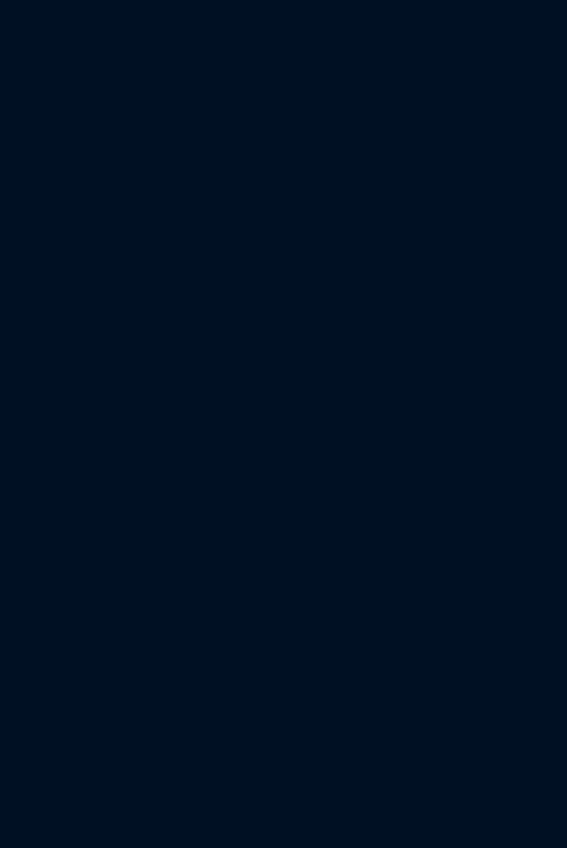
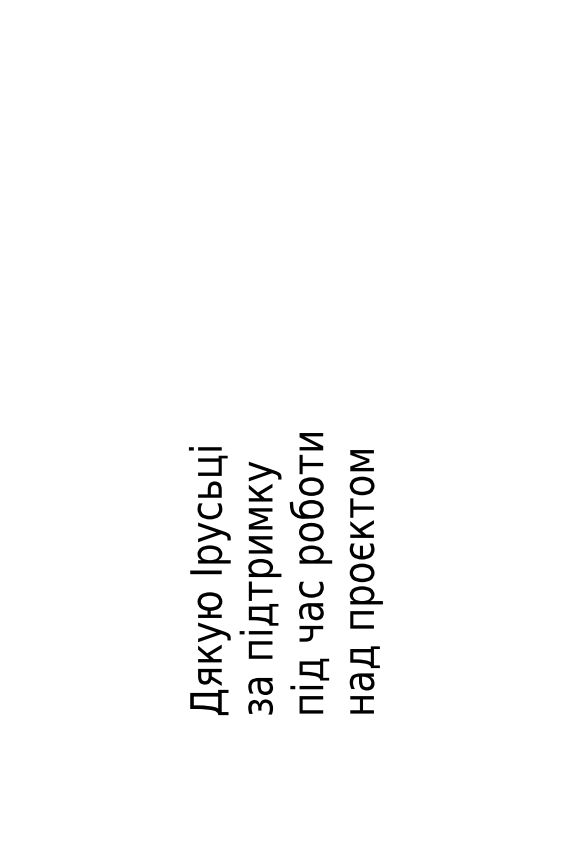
text: none -> під час роботи (310, 573)
text: none -> Дякую Ірусьці (209, 581)
text: none -> над проєктом (366, 581)
text: none -> за підтримку (260, 588)

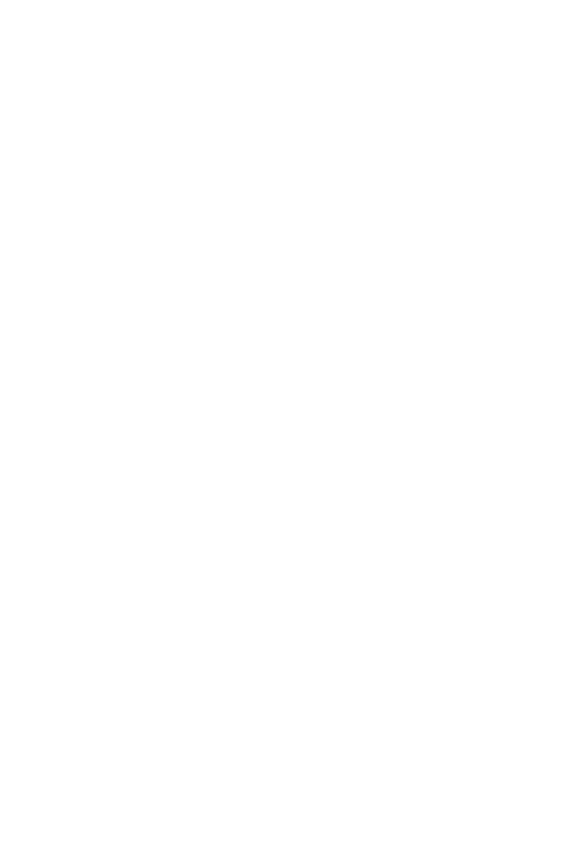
text: під час роботи (310, 573) -> none
text: Дякую Ірусьці (209, 581) -> none
text: над проєктом (366, 581) -> none
text: за підтримку (260, 588) -> none

